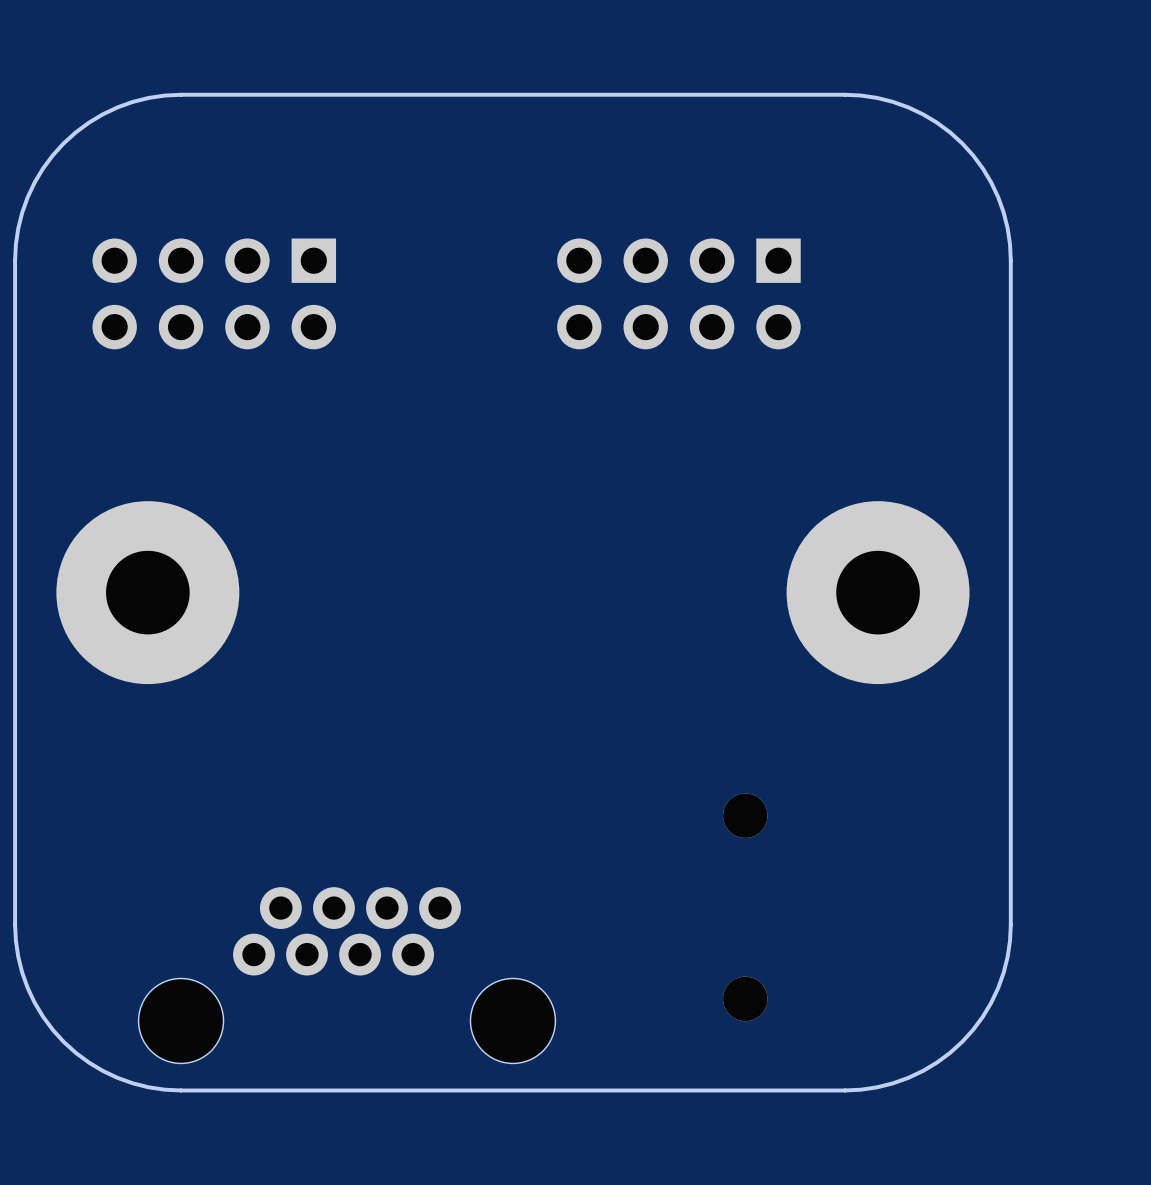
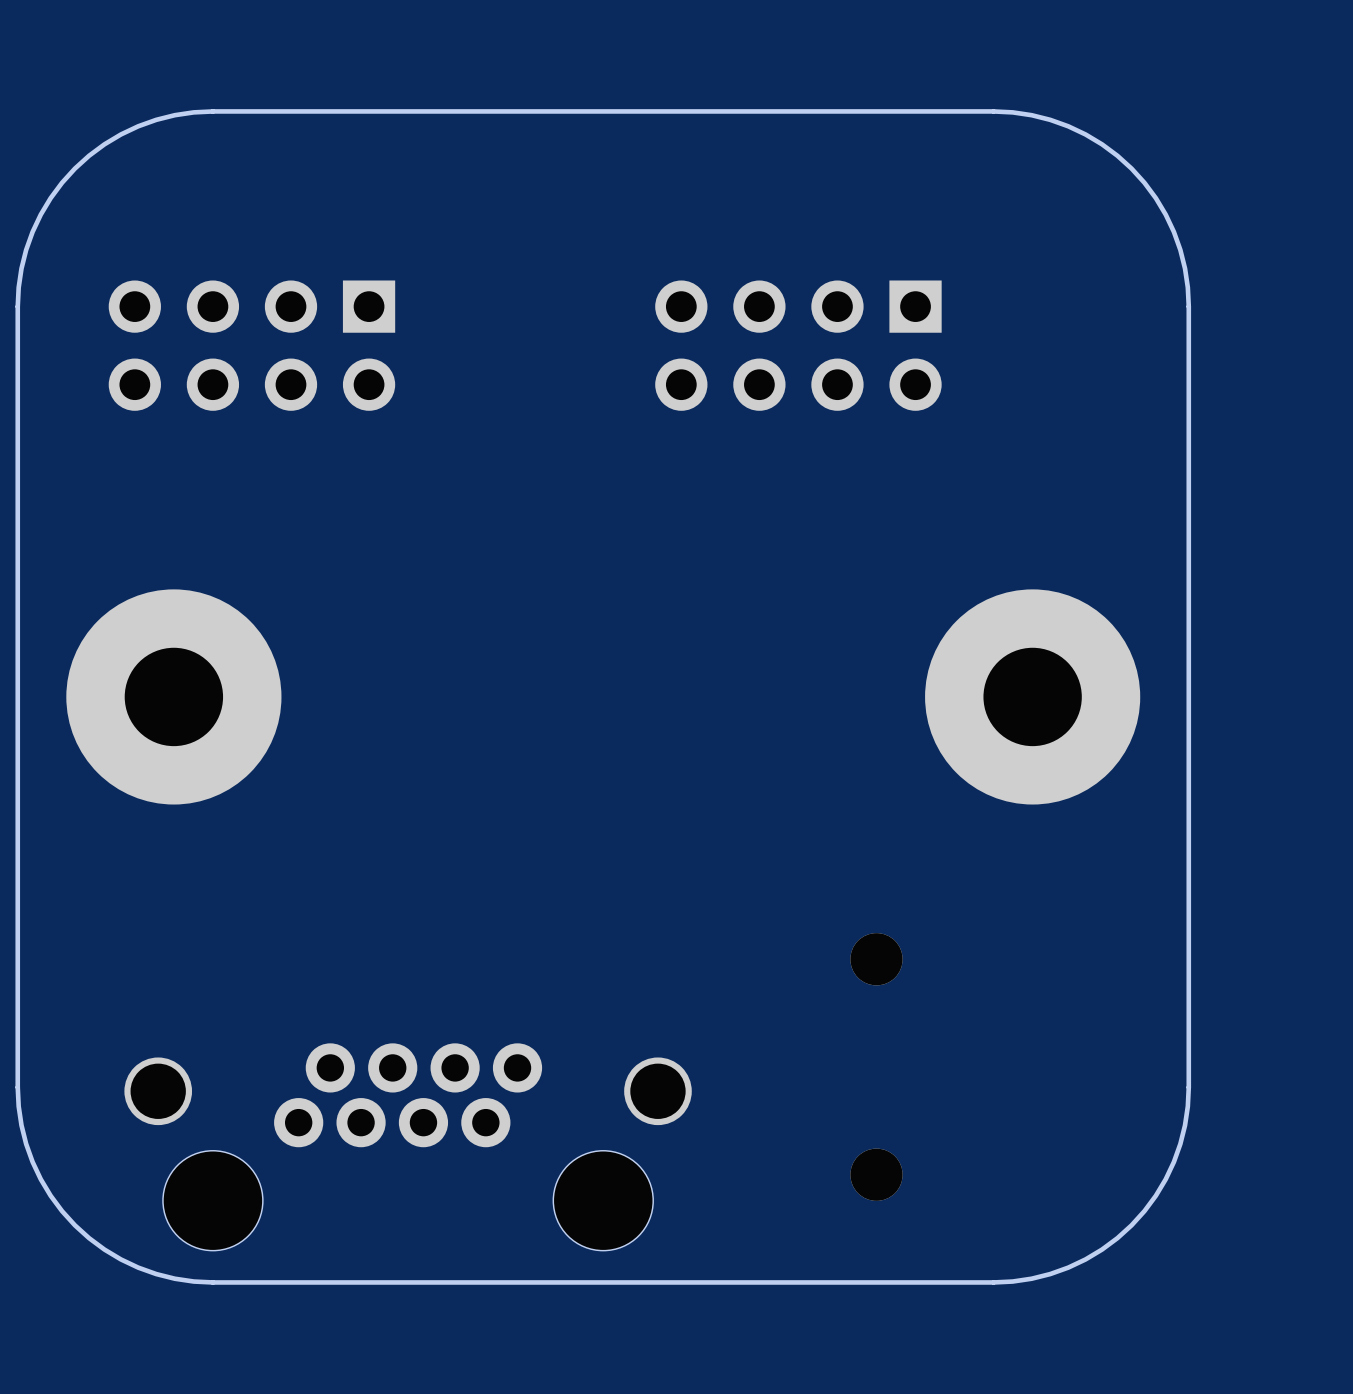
part footprint: [138, 887, 556, 1064] -> [124, 1043, 692, 1251]

